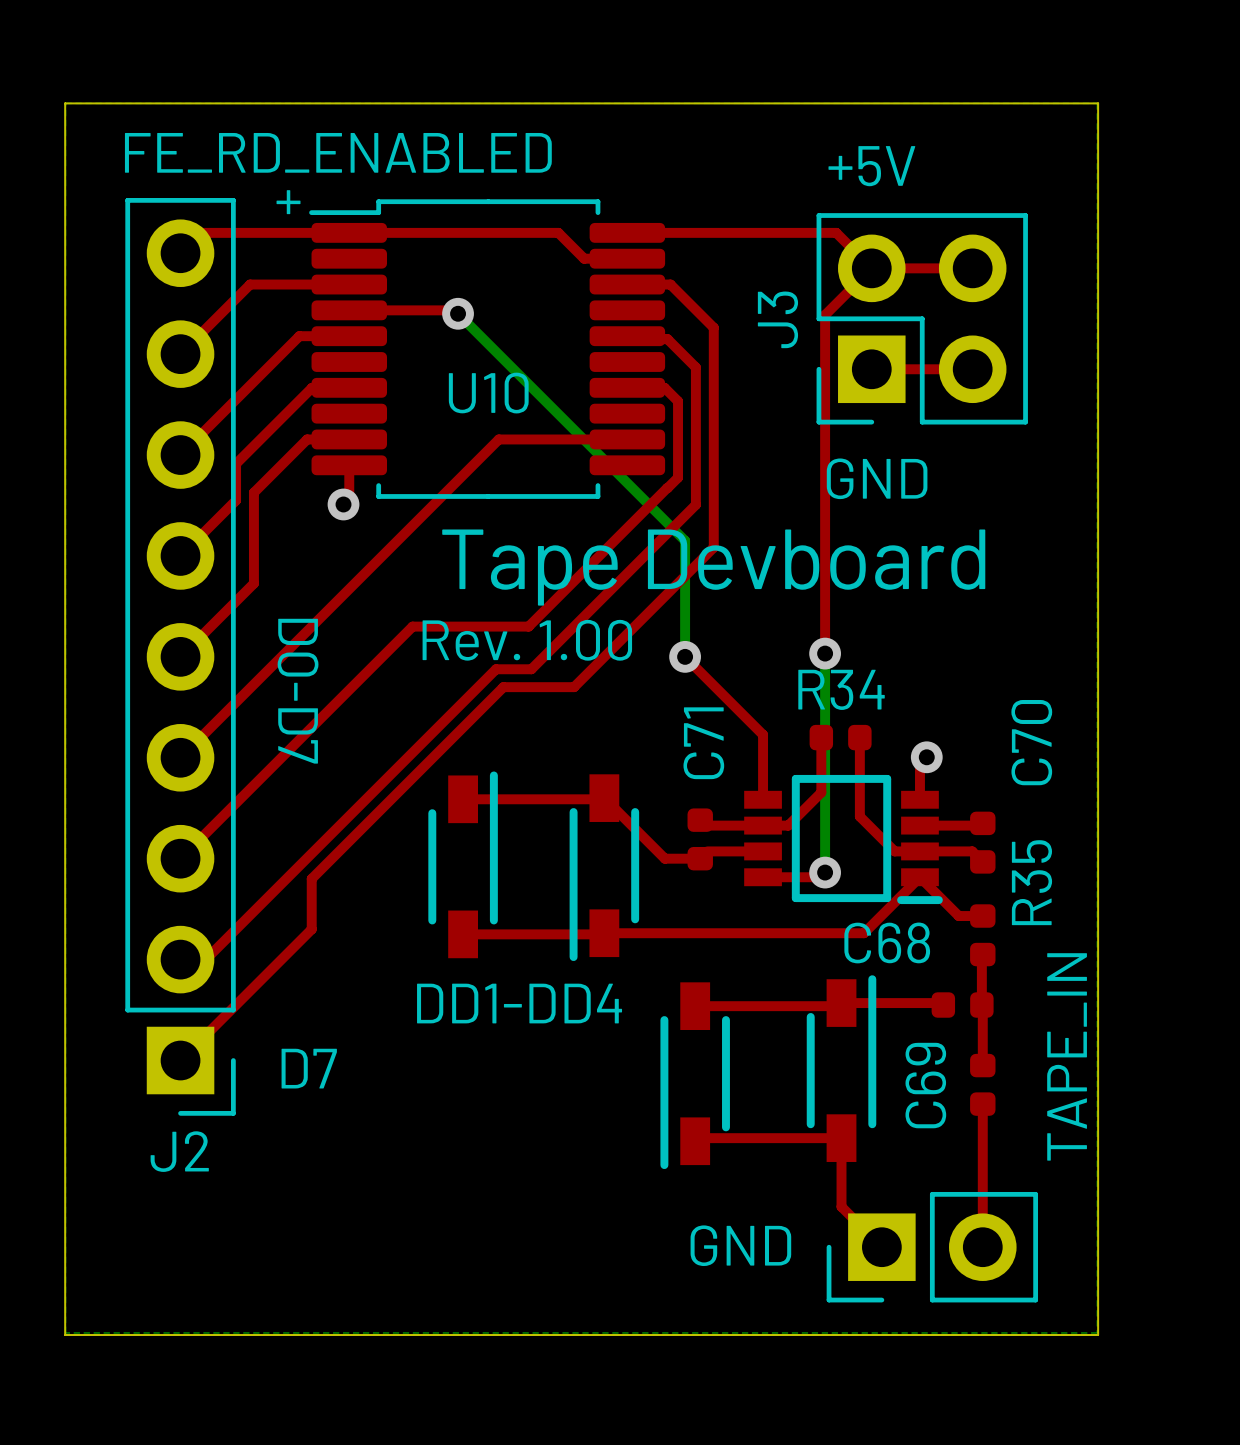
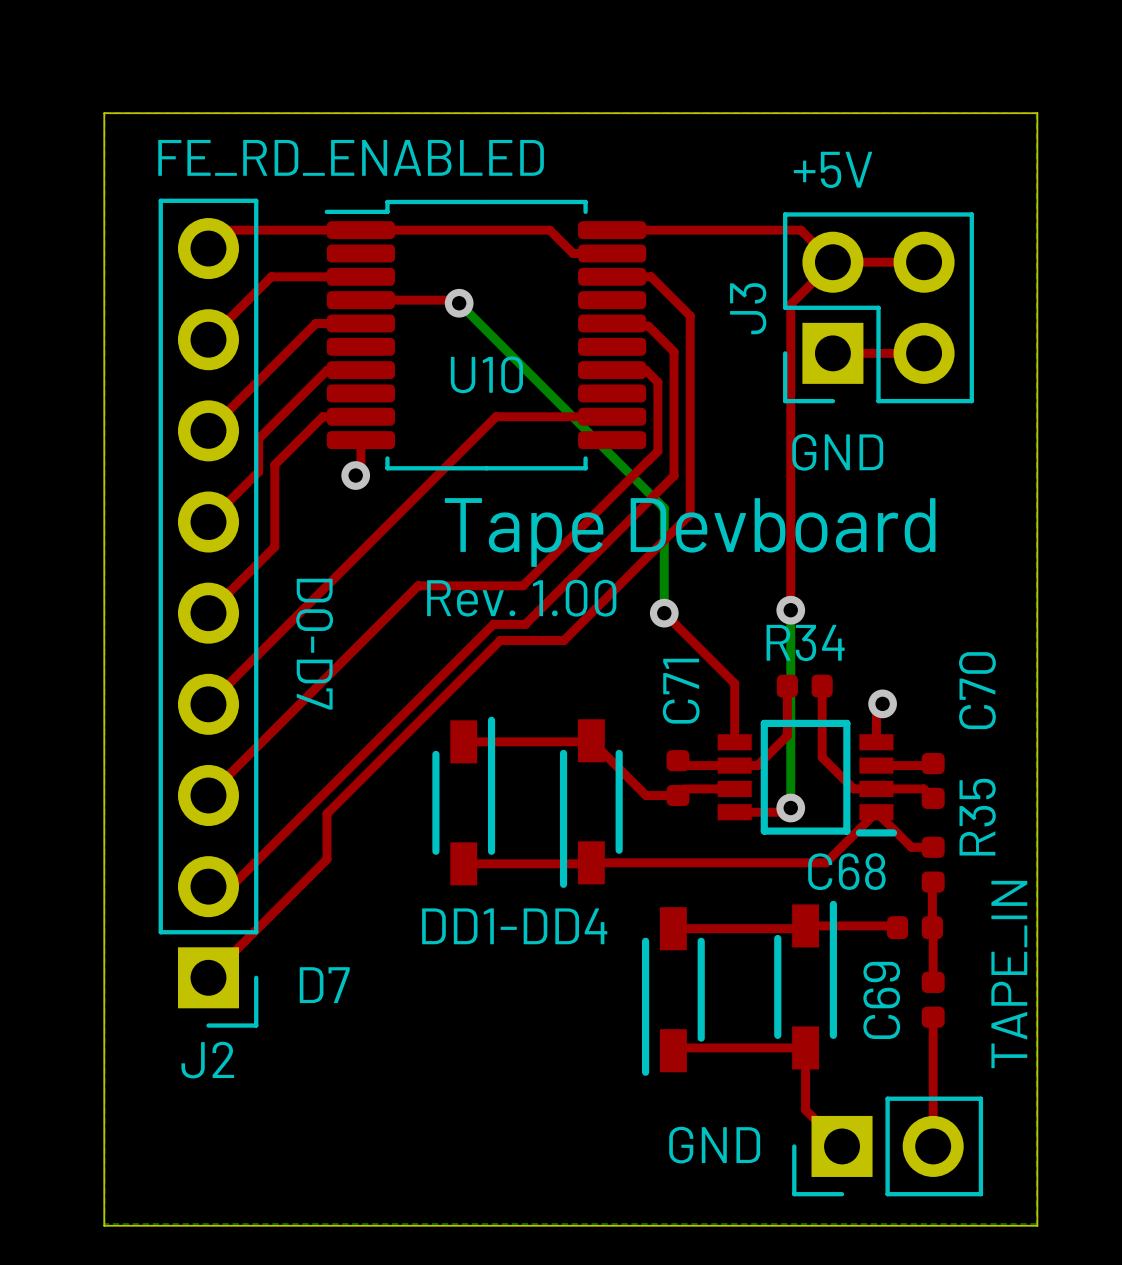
text: + (288, 202) -> none

